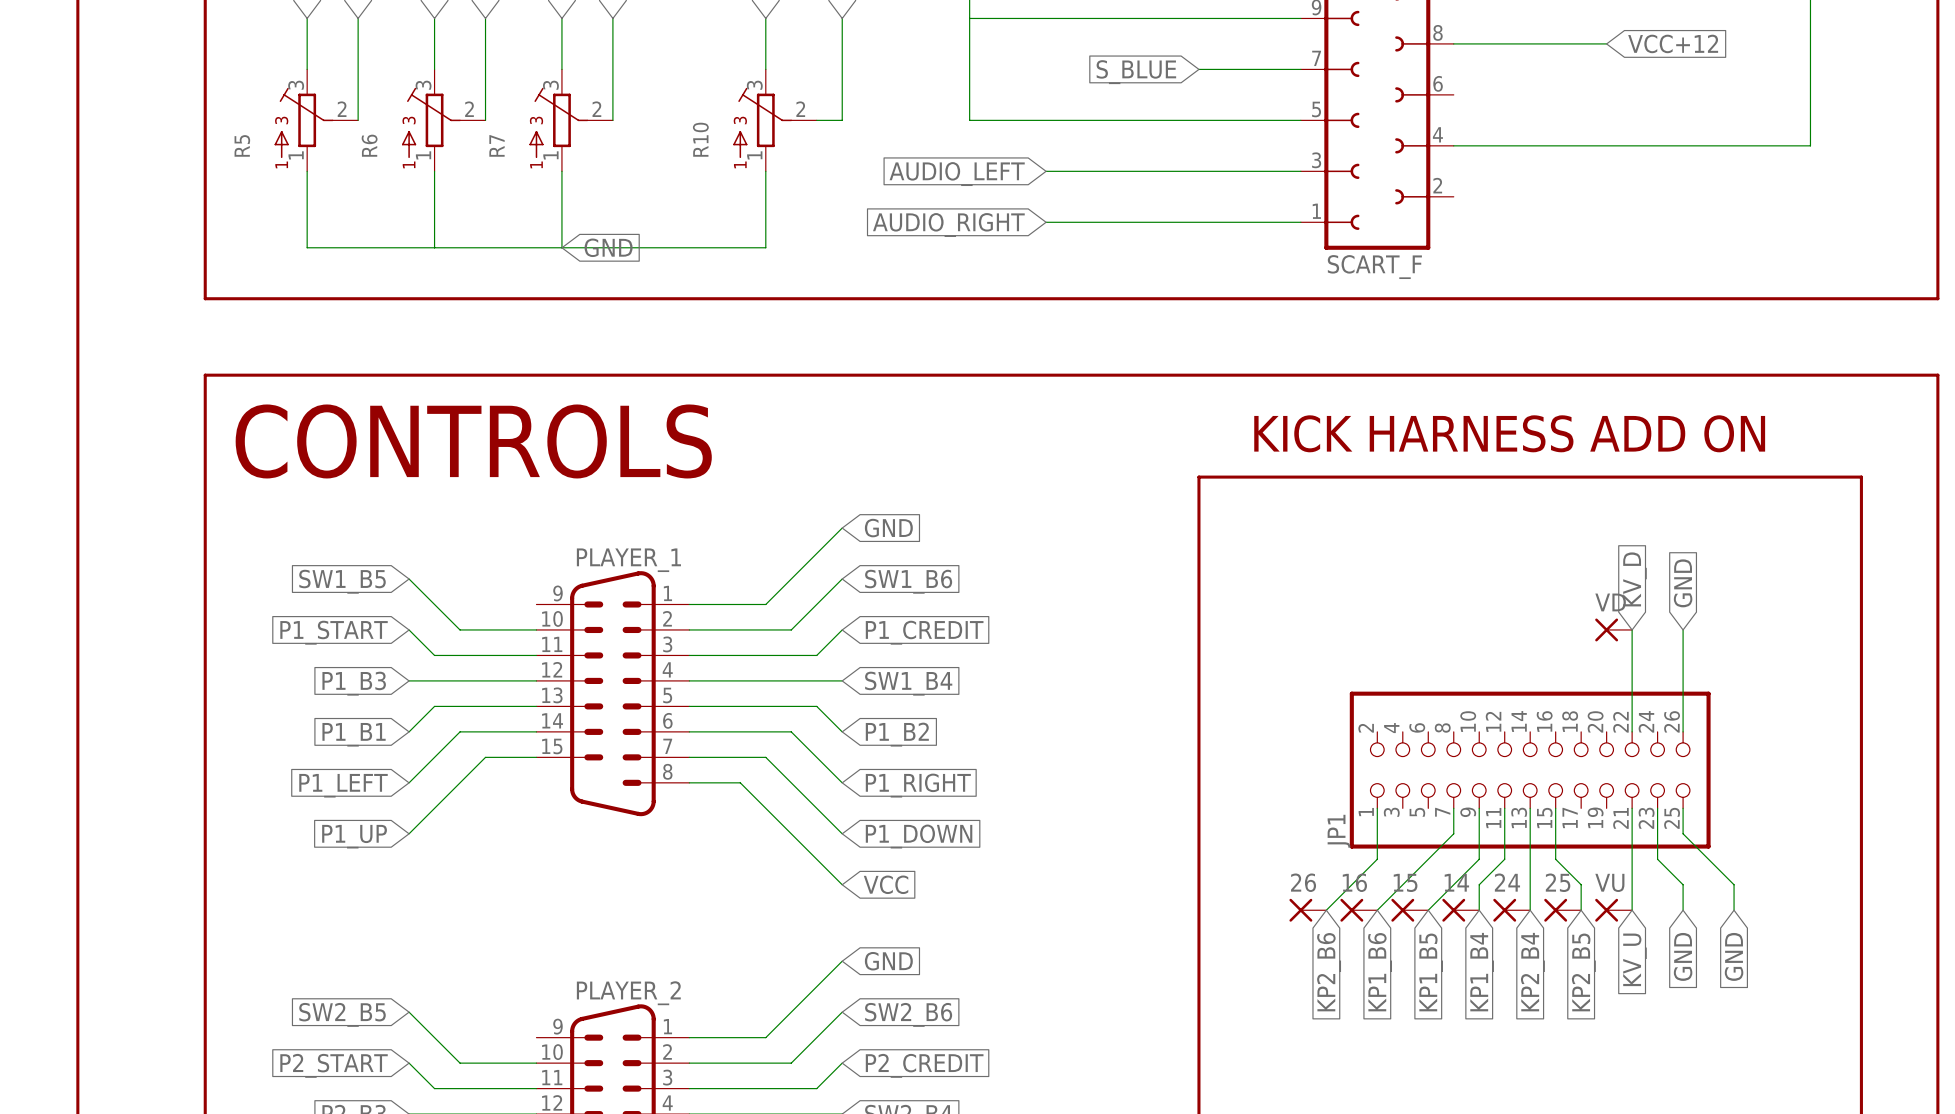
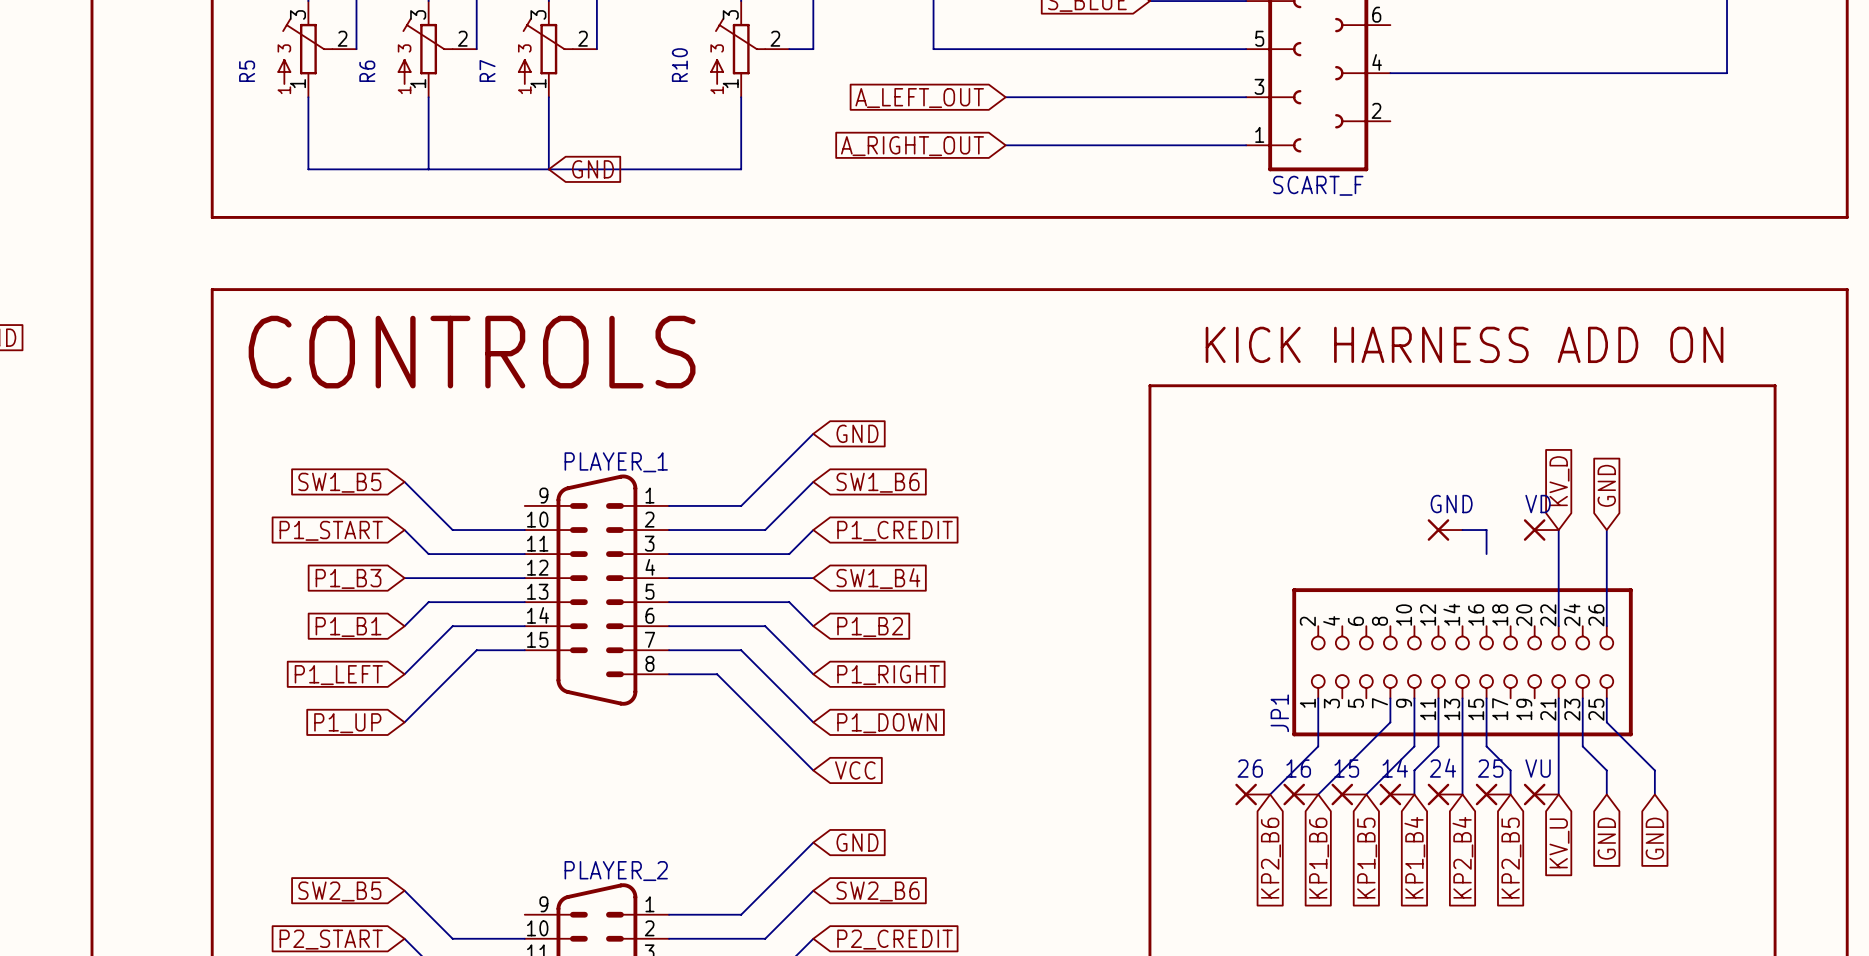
global label: AUDIO_LEFT (957, 174) -> A_LEFT_OUT (919, 98)
global label: AUDIO_RIGHT (948, 225) -> A_RIGHT_OUT (912, 146)
GND: none -> (1445, 530)
wire: none -> (1462, 530) (1486, 530) (1486, 554)

